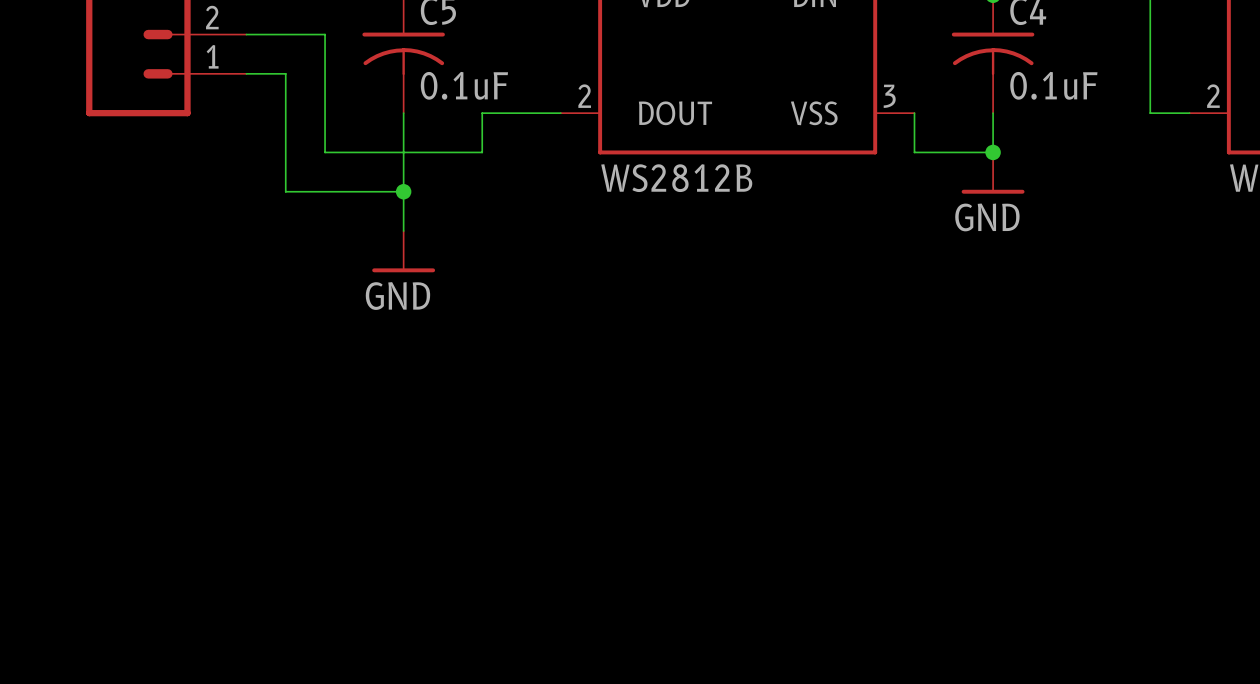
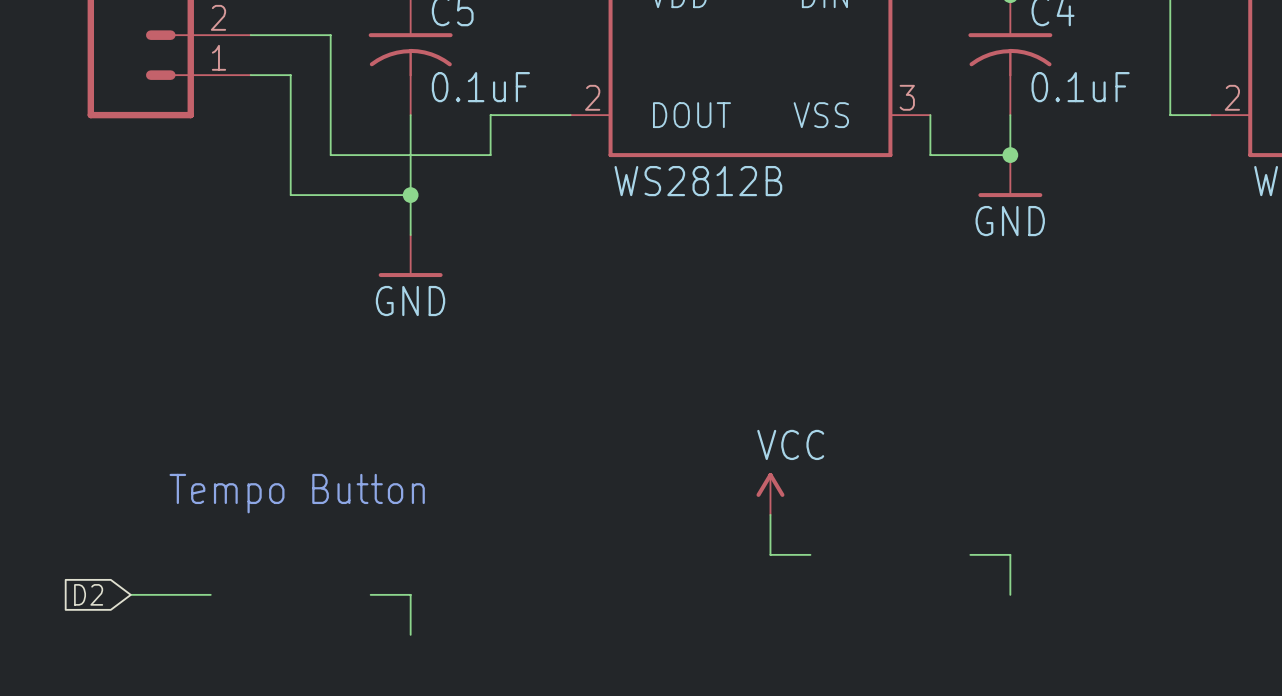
text: none -> Tempo Button (297, 493)
power symbol: none -> VCC (770, 493)
wire: none -> (770, 514) (770, 554) (810, 554)
wire: none -> (970, 554) (1010, 554) (1010, 594)
global label: none -> D2 (88, 594)
wire: none -> (130, 594) (210, 594)
wire: none -> (370, 594) (410, 594) (410, 634)

